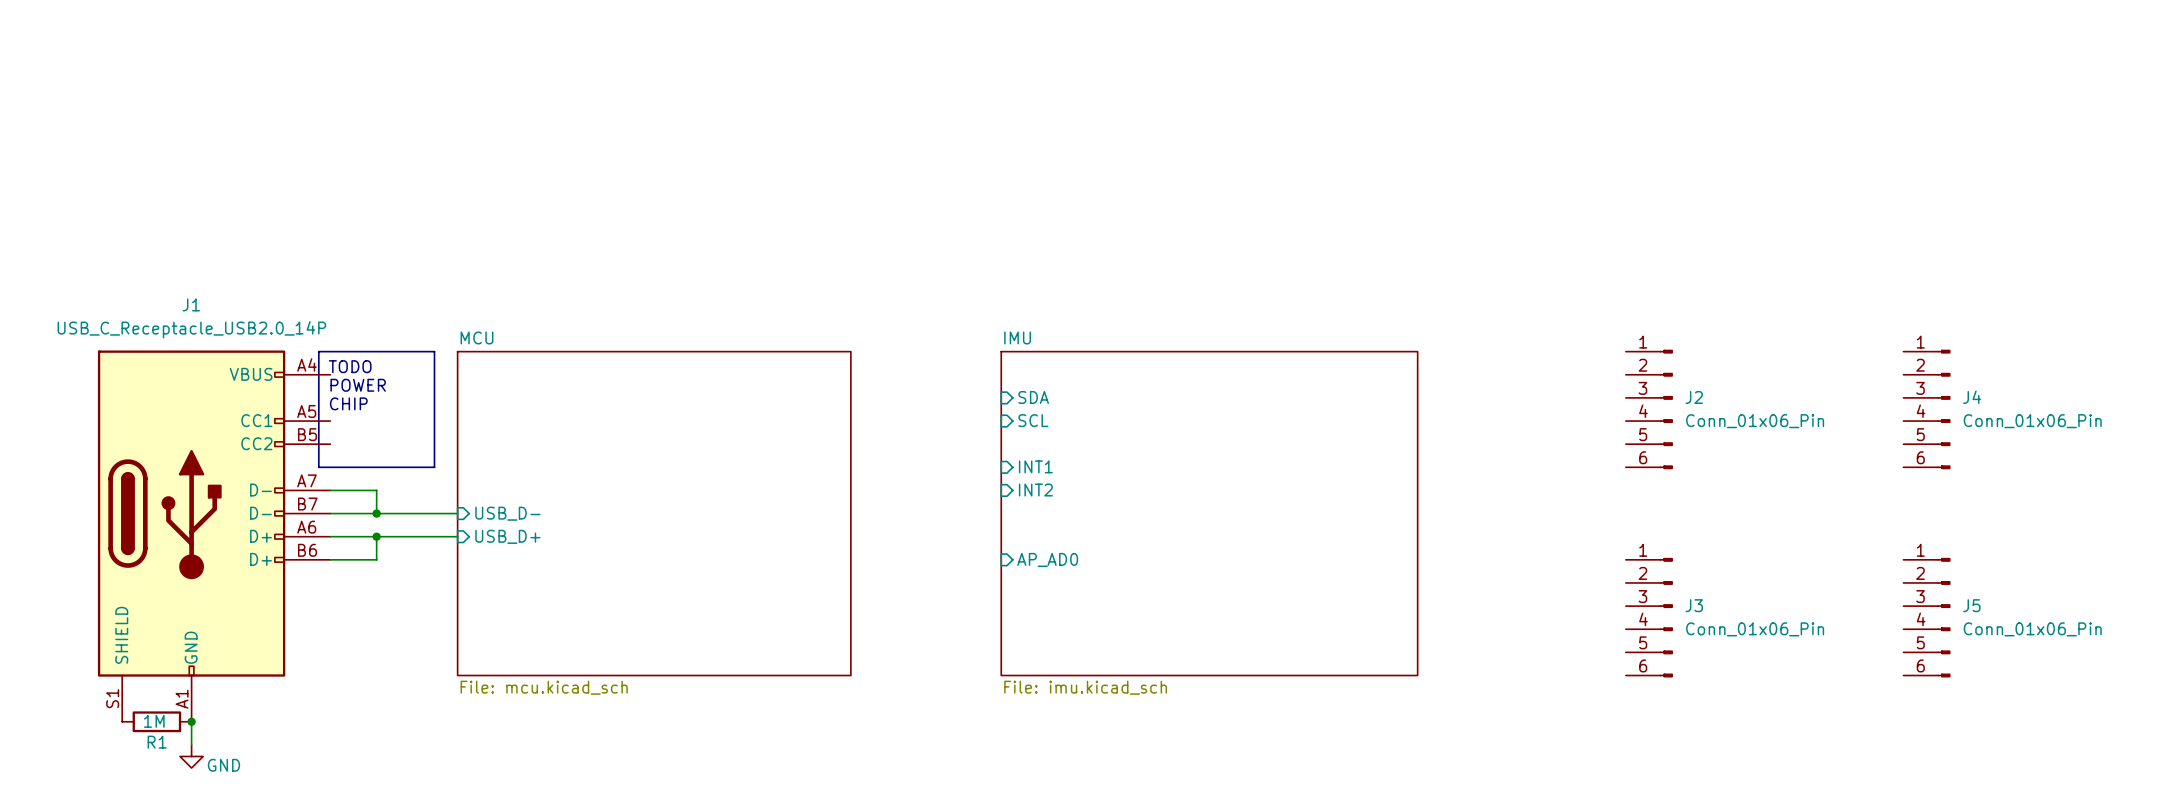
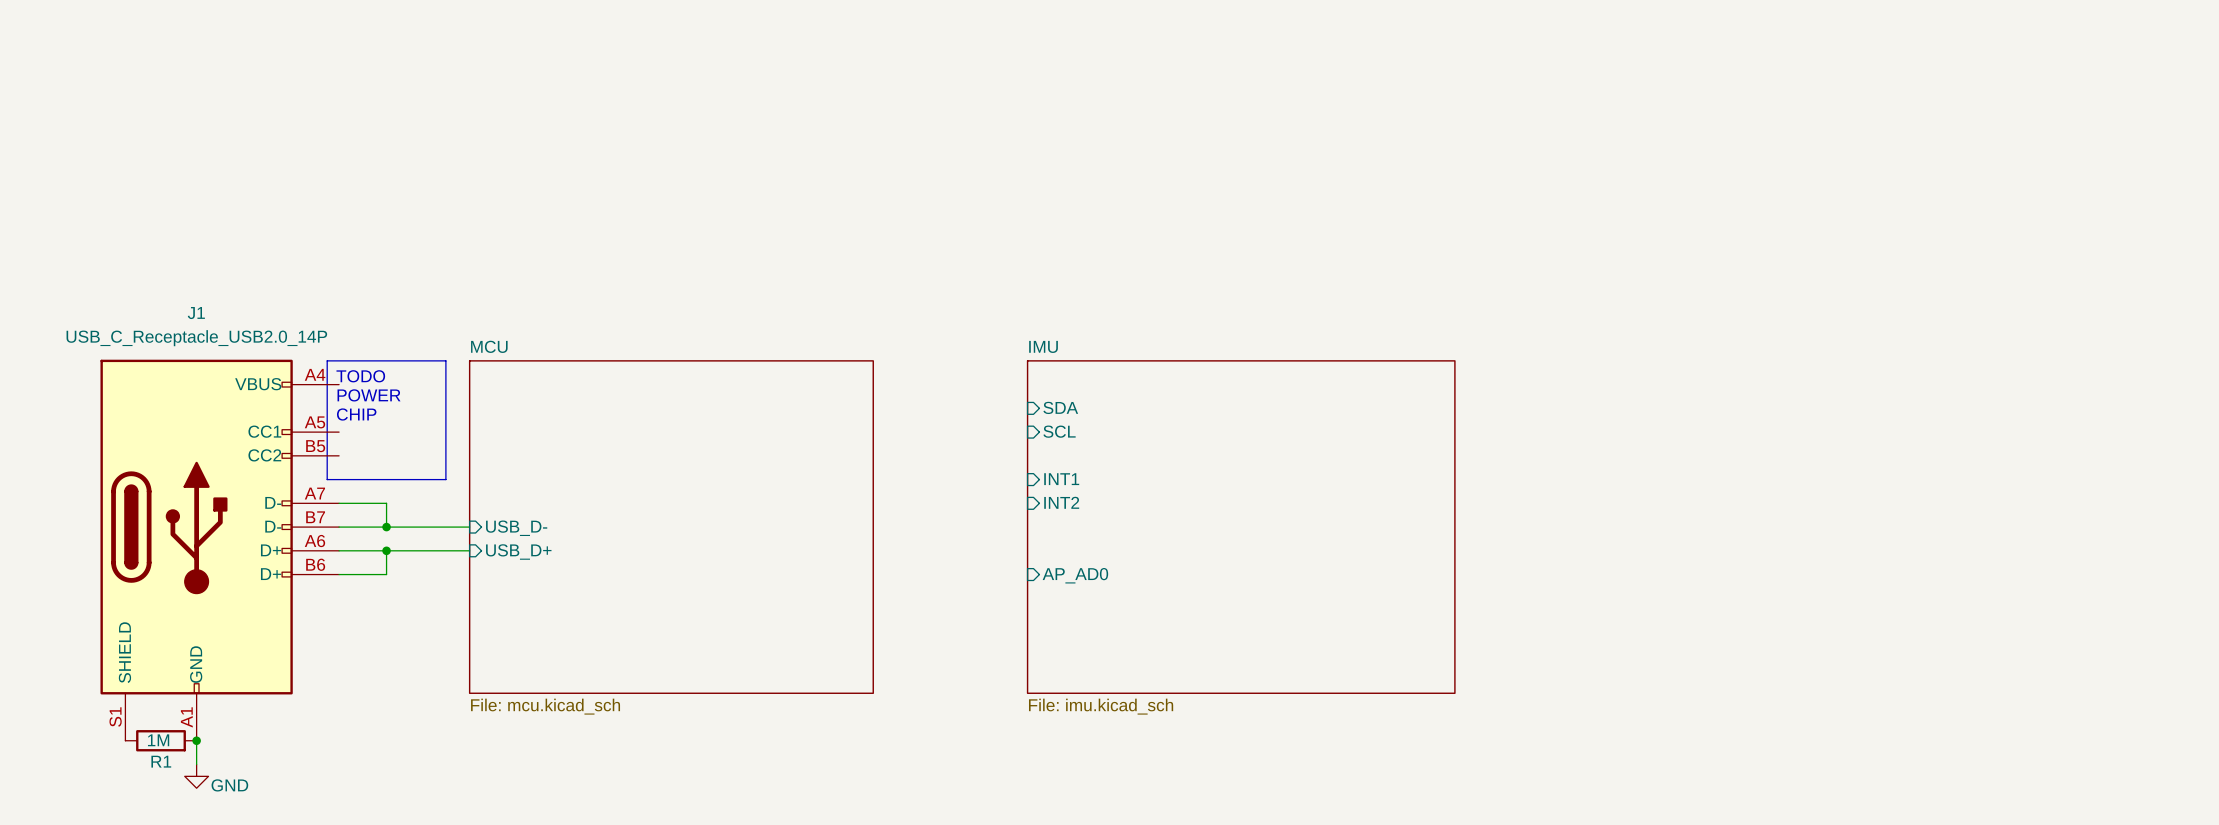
J2: Conn_01x06_Pin (1649, 409) -> none
J4: Conn_01x06_Pin (1926, 409) -> none
J3: Conn_01x06_Pin (1649, 617) -> none
J5: Conn_01x06_Pin (1926, 617) -> none

